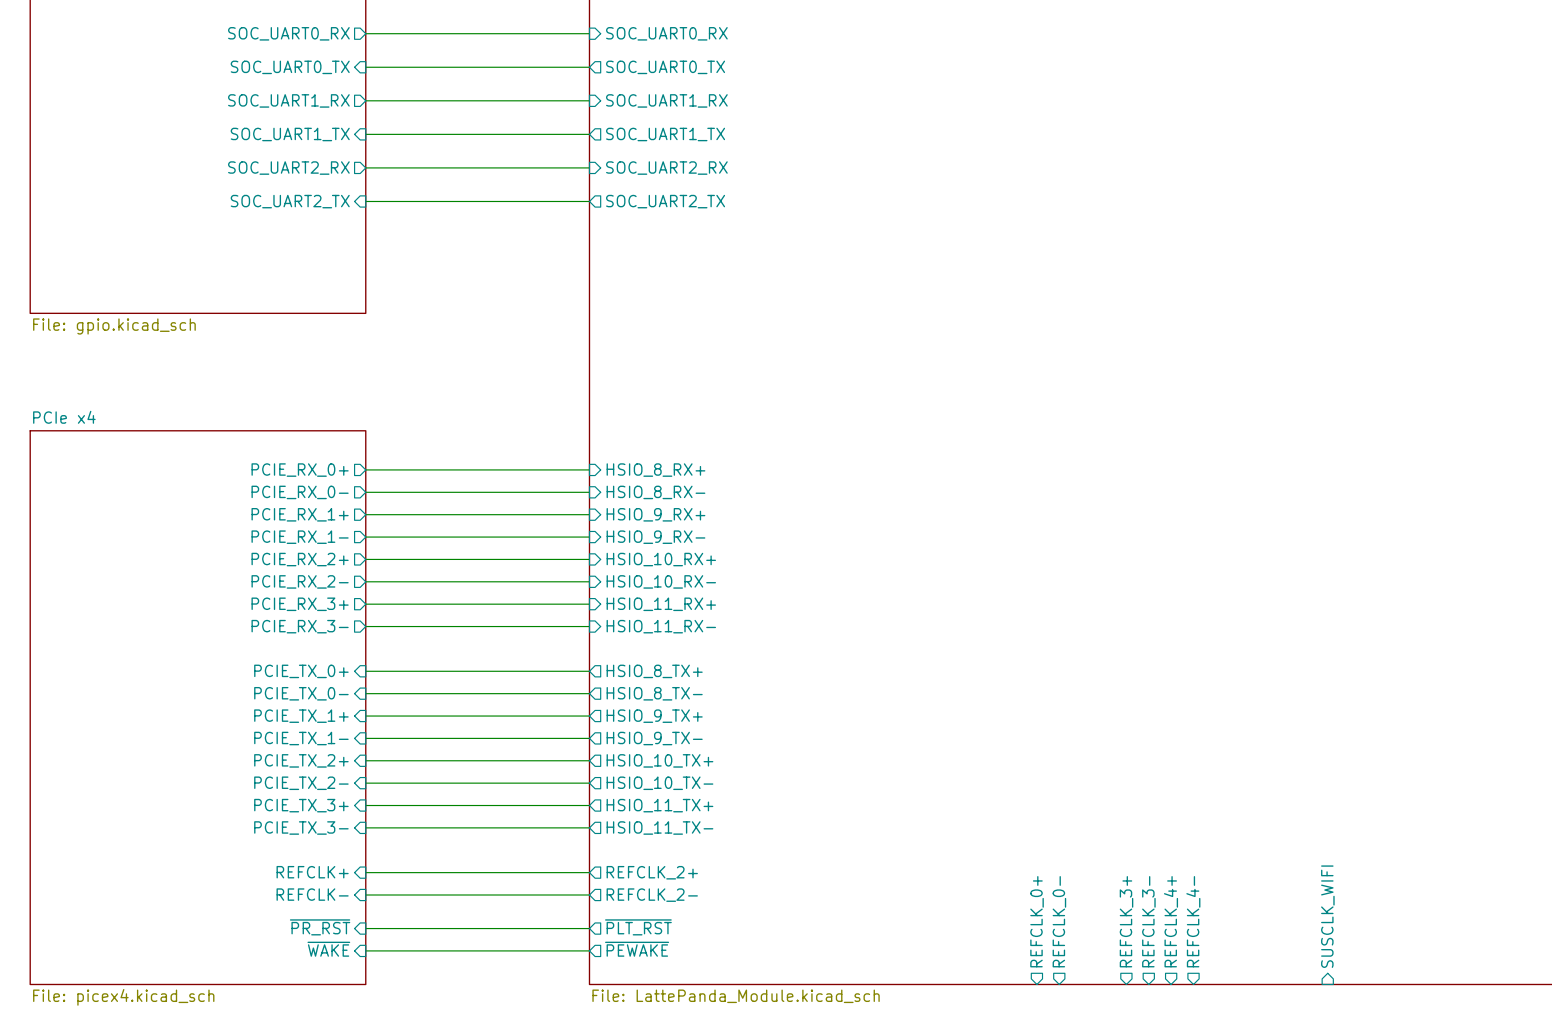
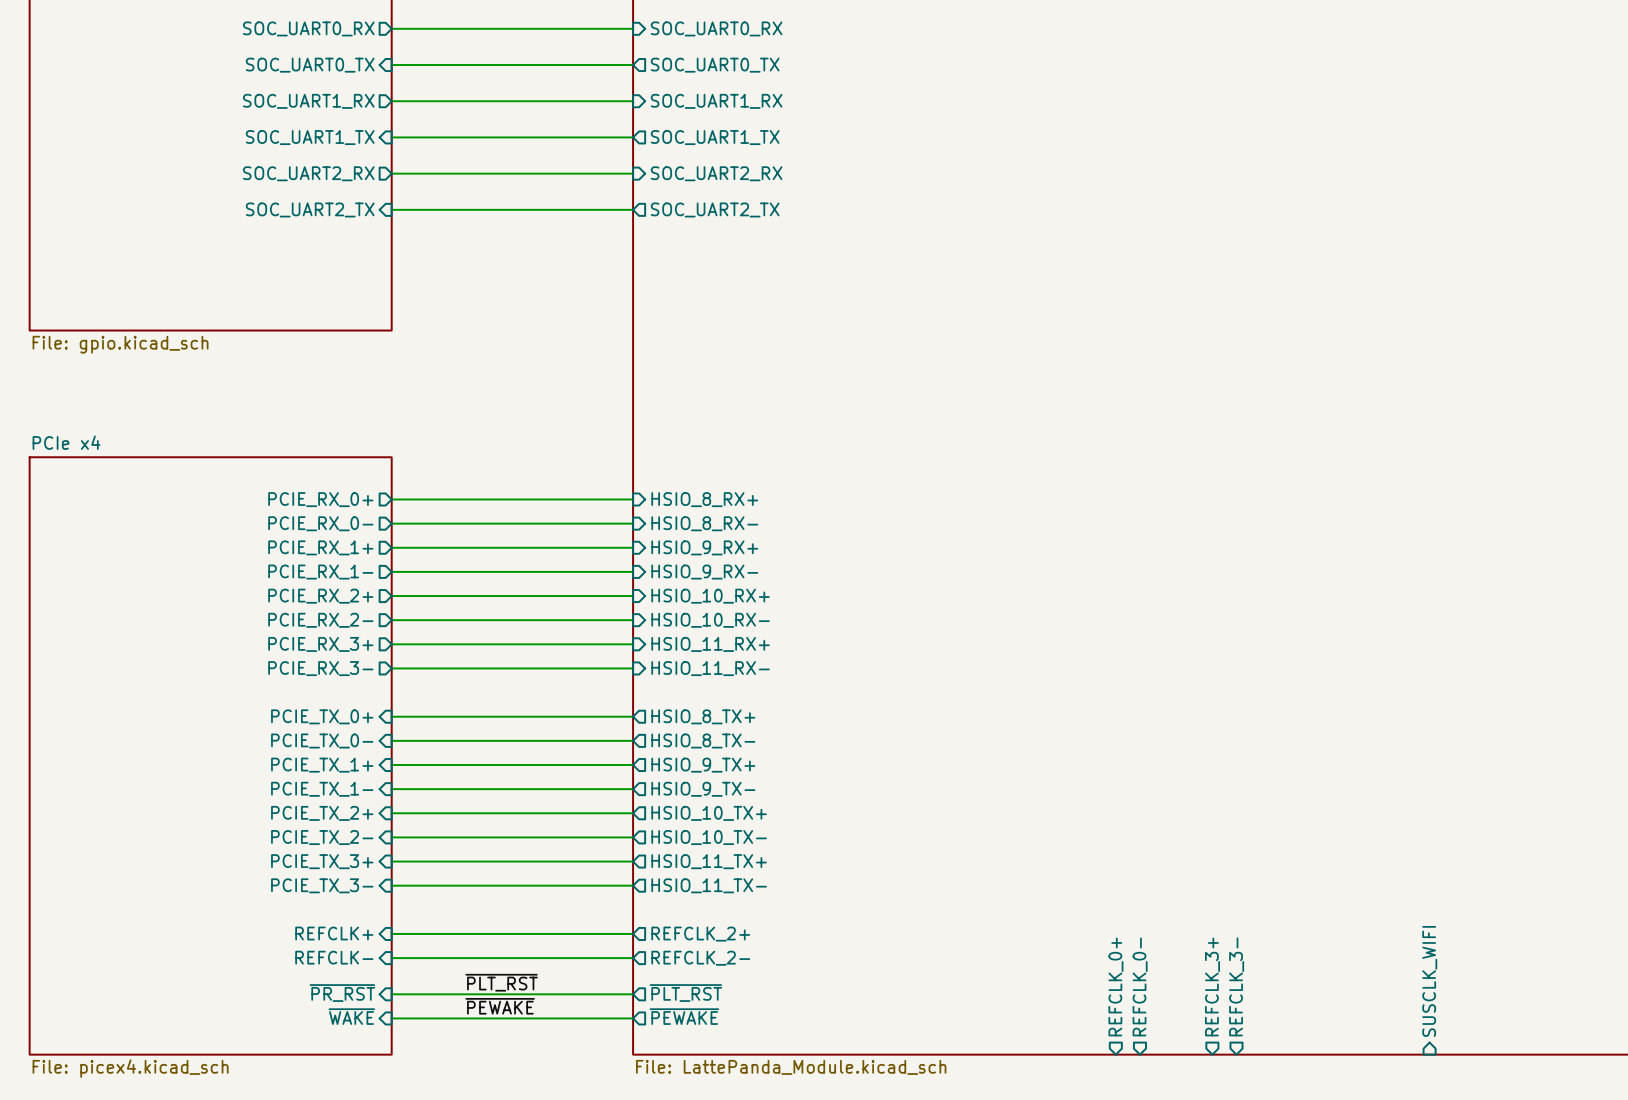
label: none -> ~{PLT_RST} (501, 982)
sheet pin: REFCLK_4+ (1170, 921) -> none
sheet pin: REFCLK_4- (1193, 921) -> none
label: none -> ~{PEWAKE} (500, 1006)

